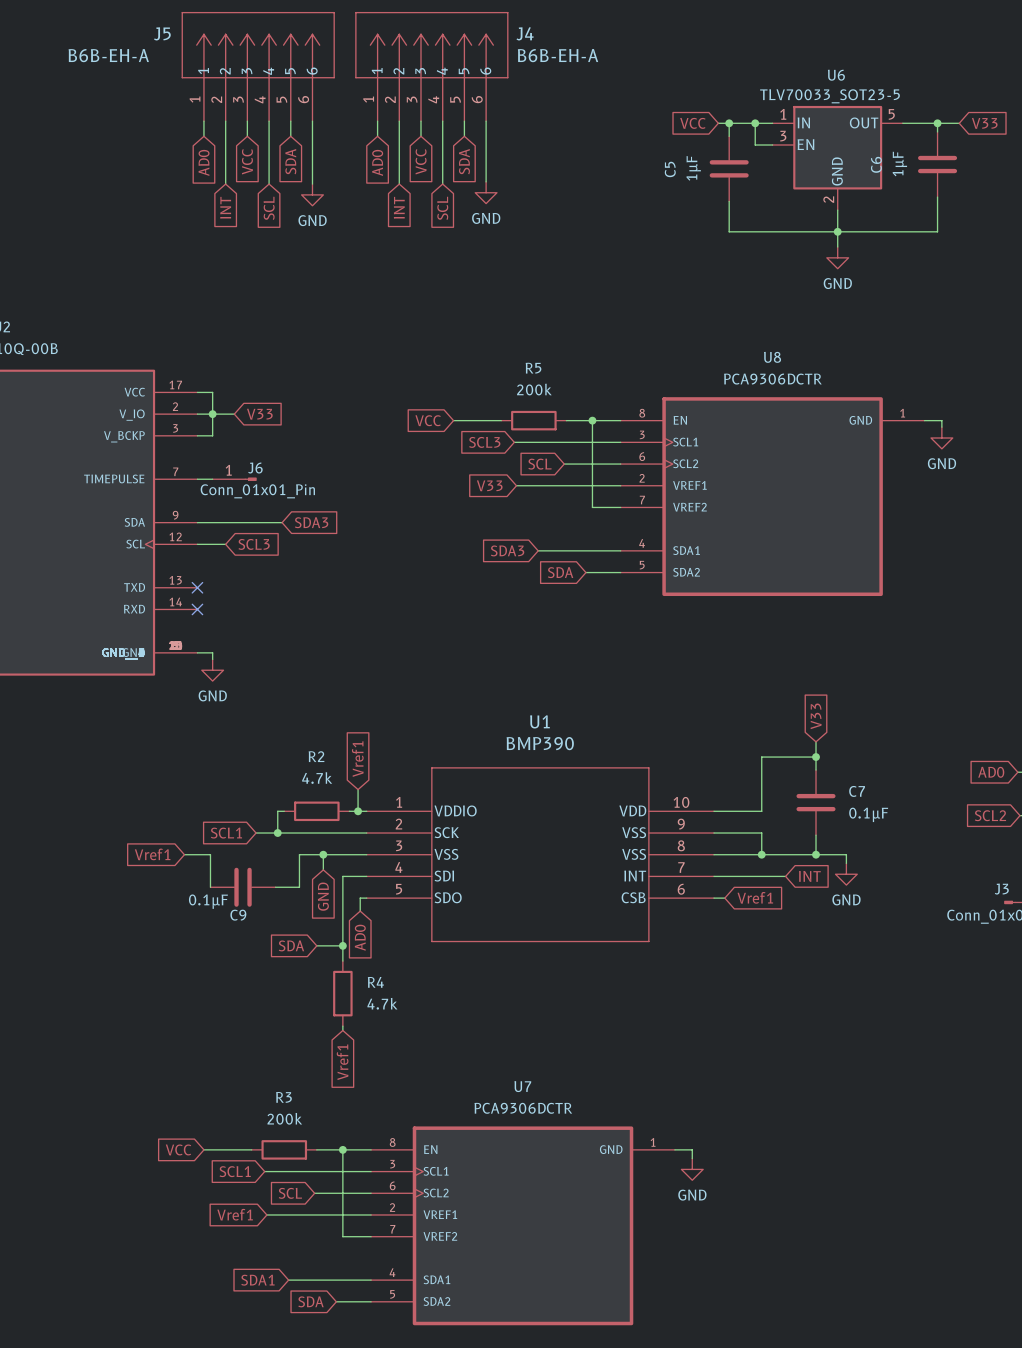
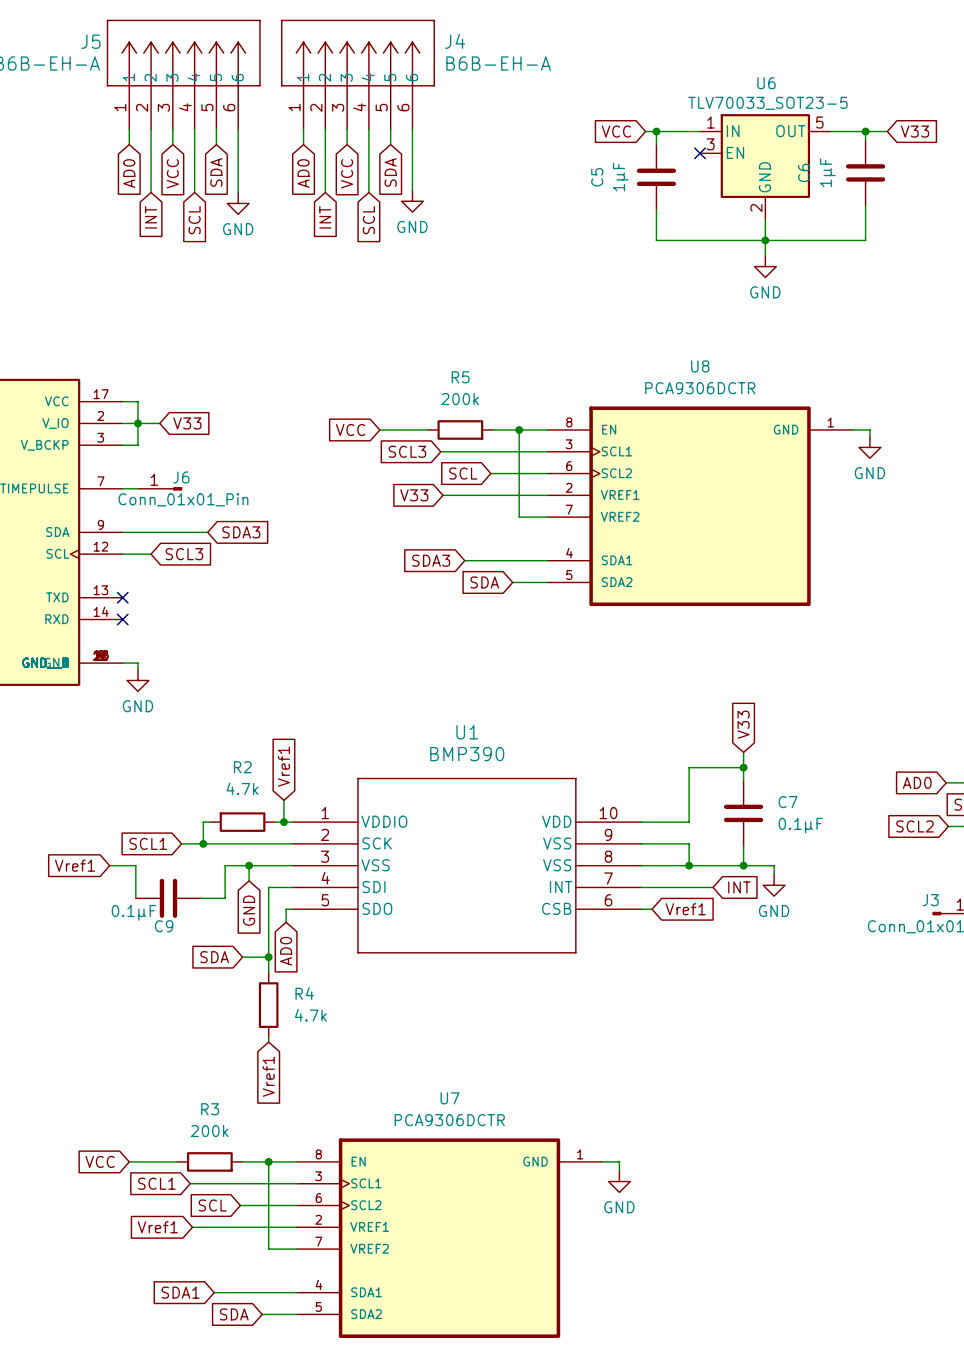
wire: (755, 123) (755, 145) (772, 145) -> none
junction: (755, 123) -> none
no-connect mark: none -> (700, 153)

